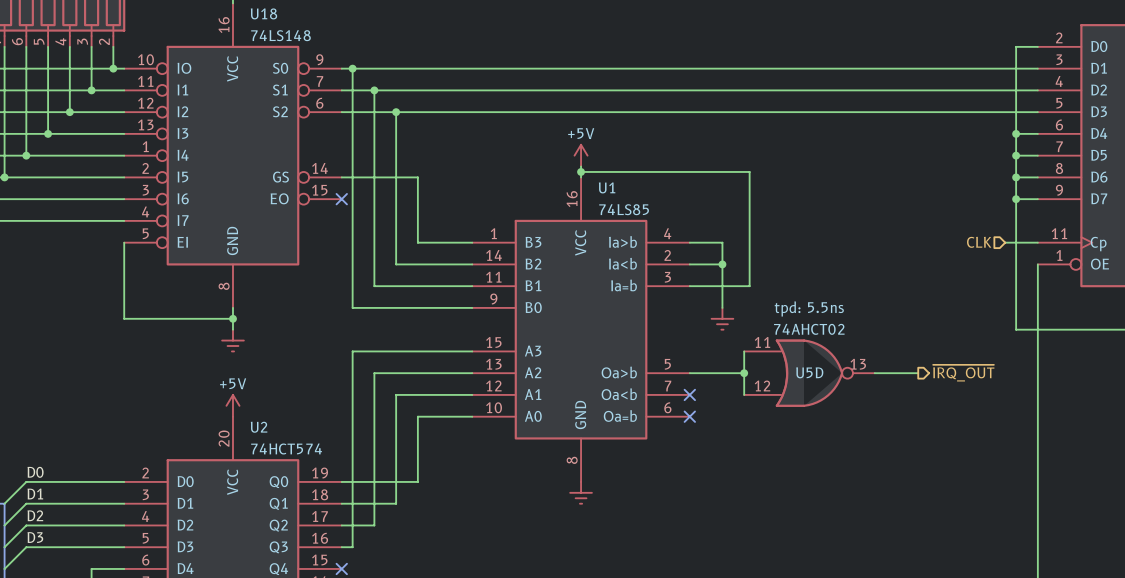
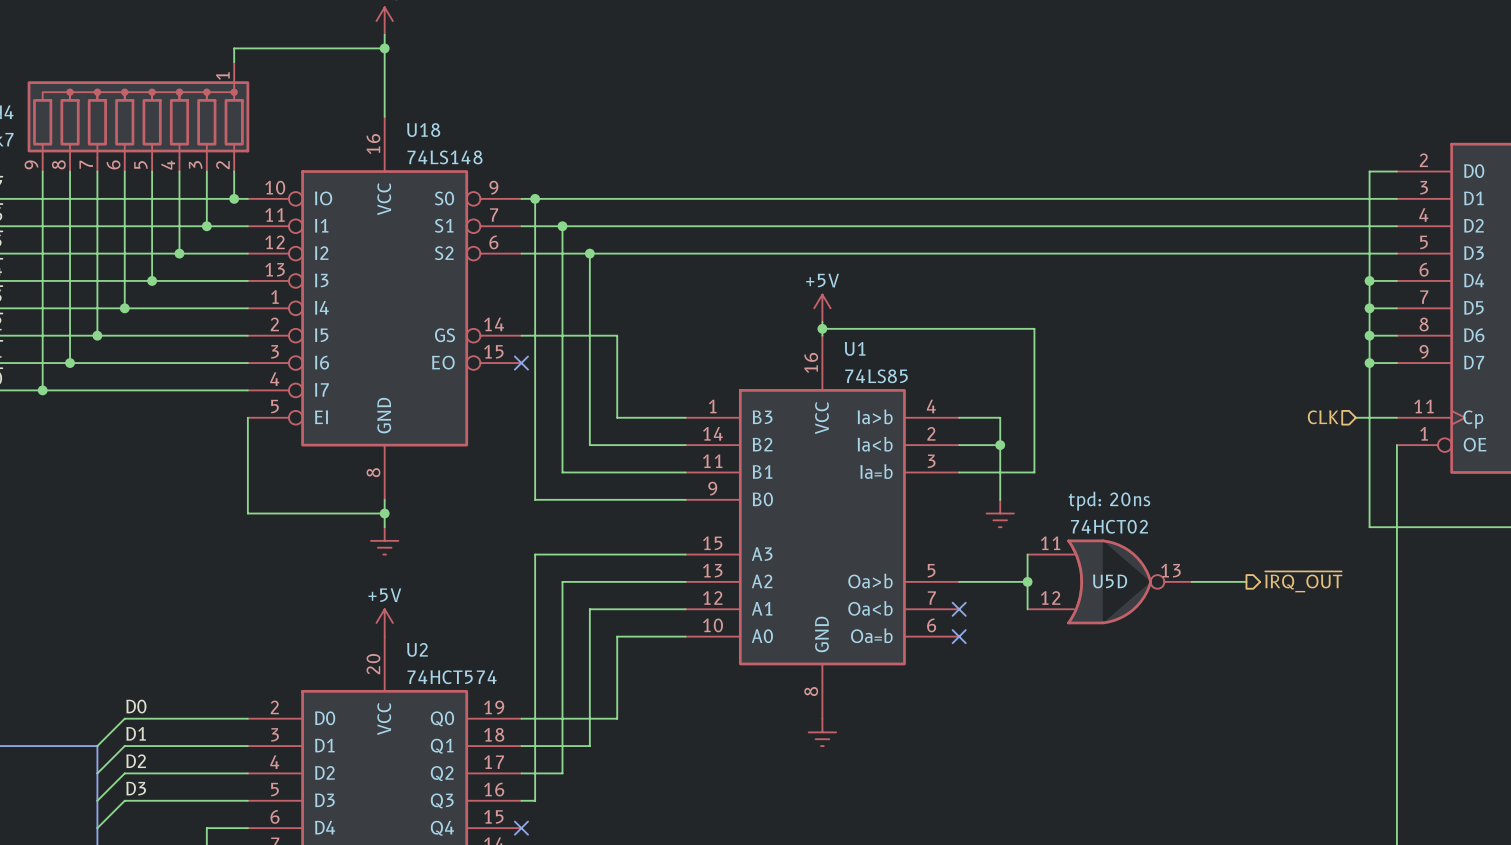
U5D text: tpd: 5.5ns (809, 308) -> tpd: 20ns (1109, 501)
U5D value: 74AHCT02 (809, 329) -> 74HCT02 (1109, 526)

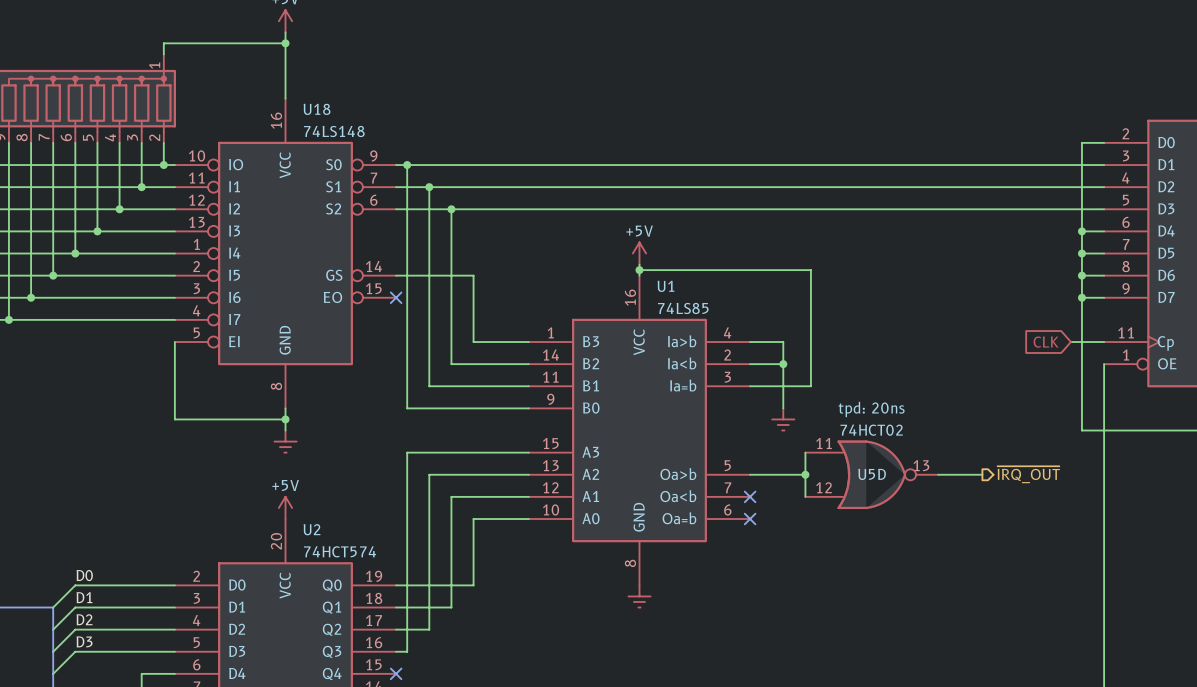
hierarchical label: CLK (1323, 417) -> none
global label: none -> CLK (1046, 342)

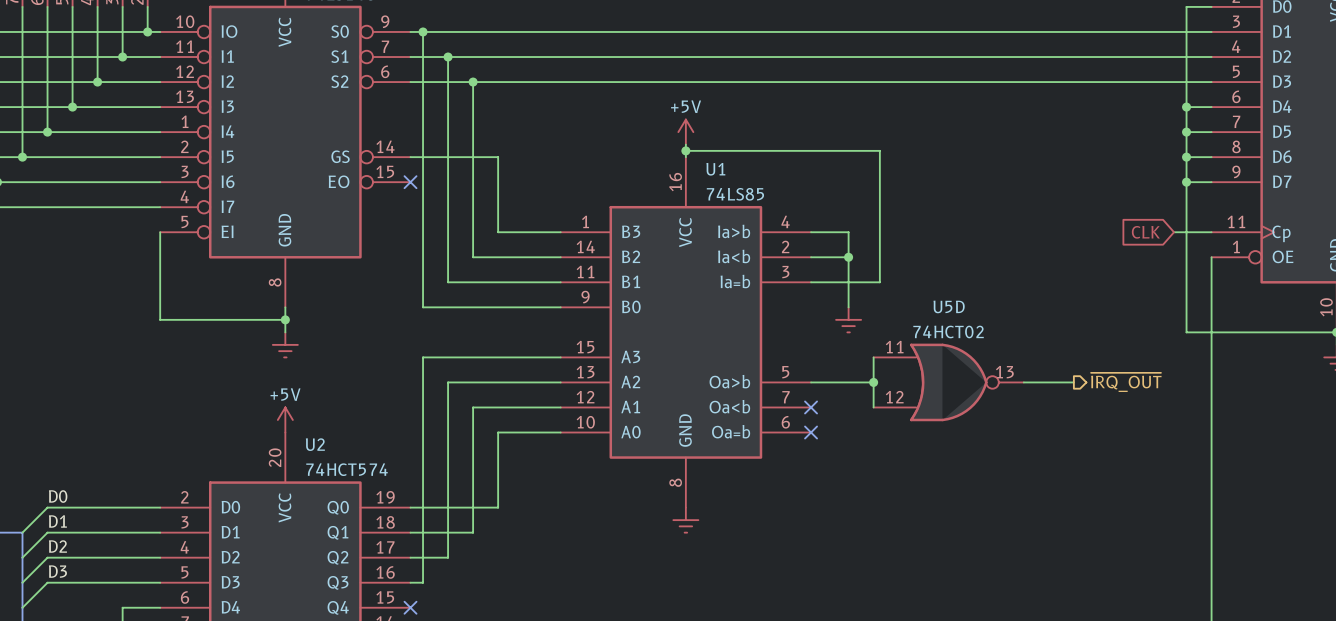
U5D text: tpd: 20ns (871, 409) -> none
U5D name position: U5D (872, 474) -> U5D (949, 306)

